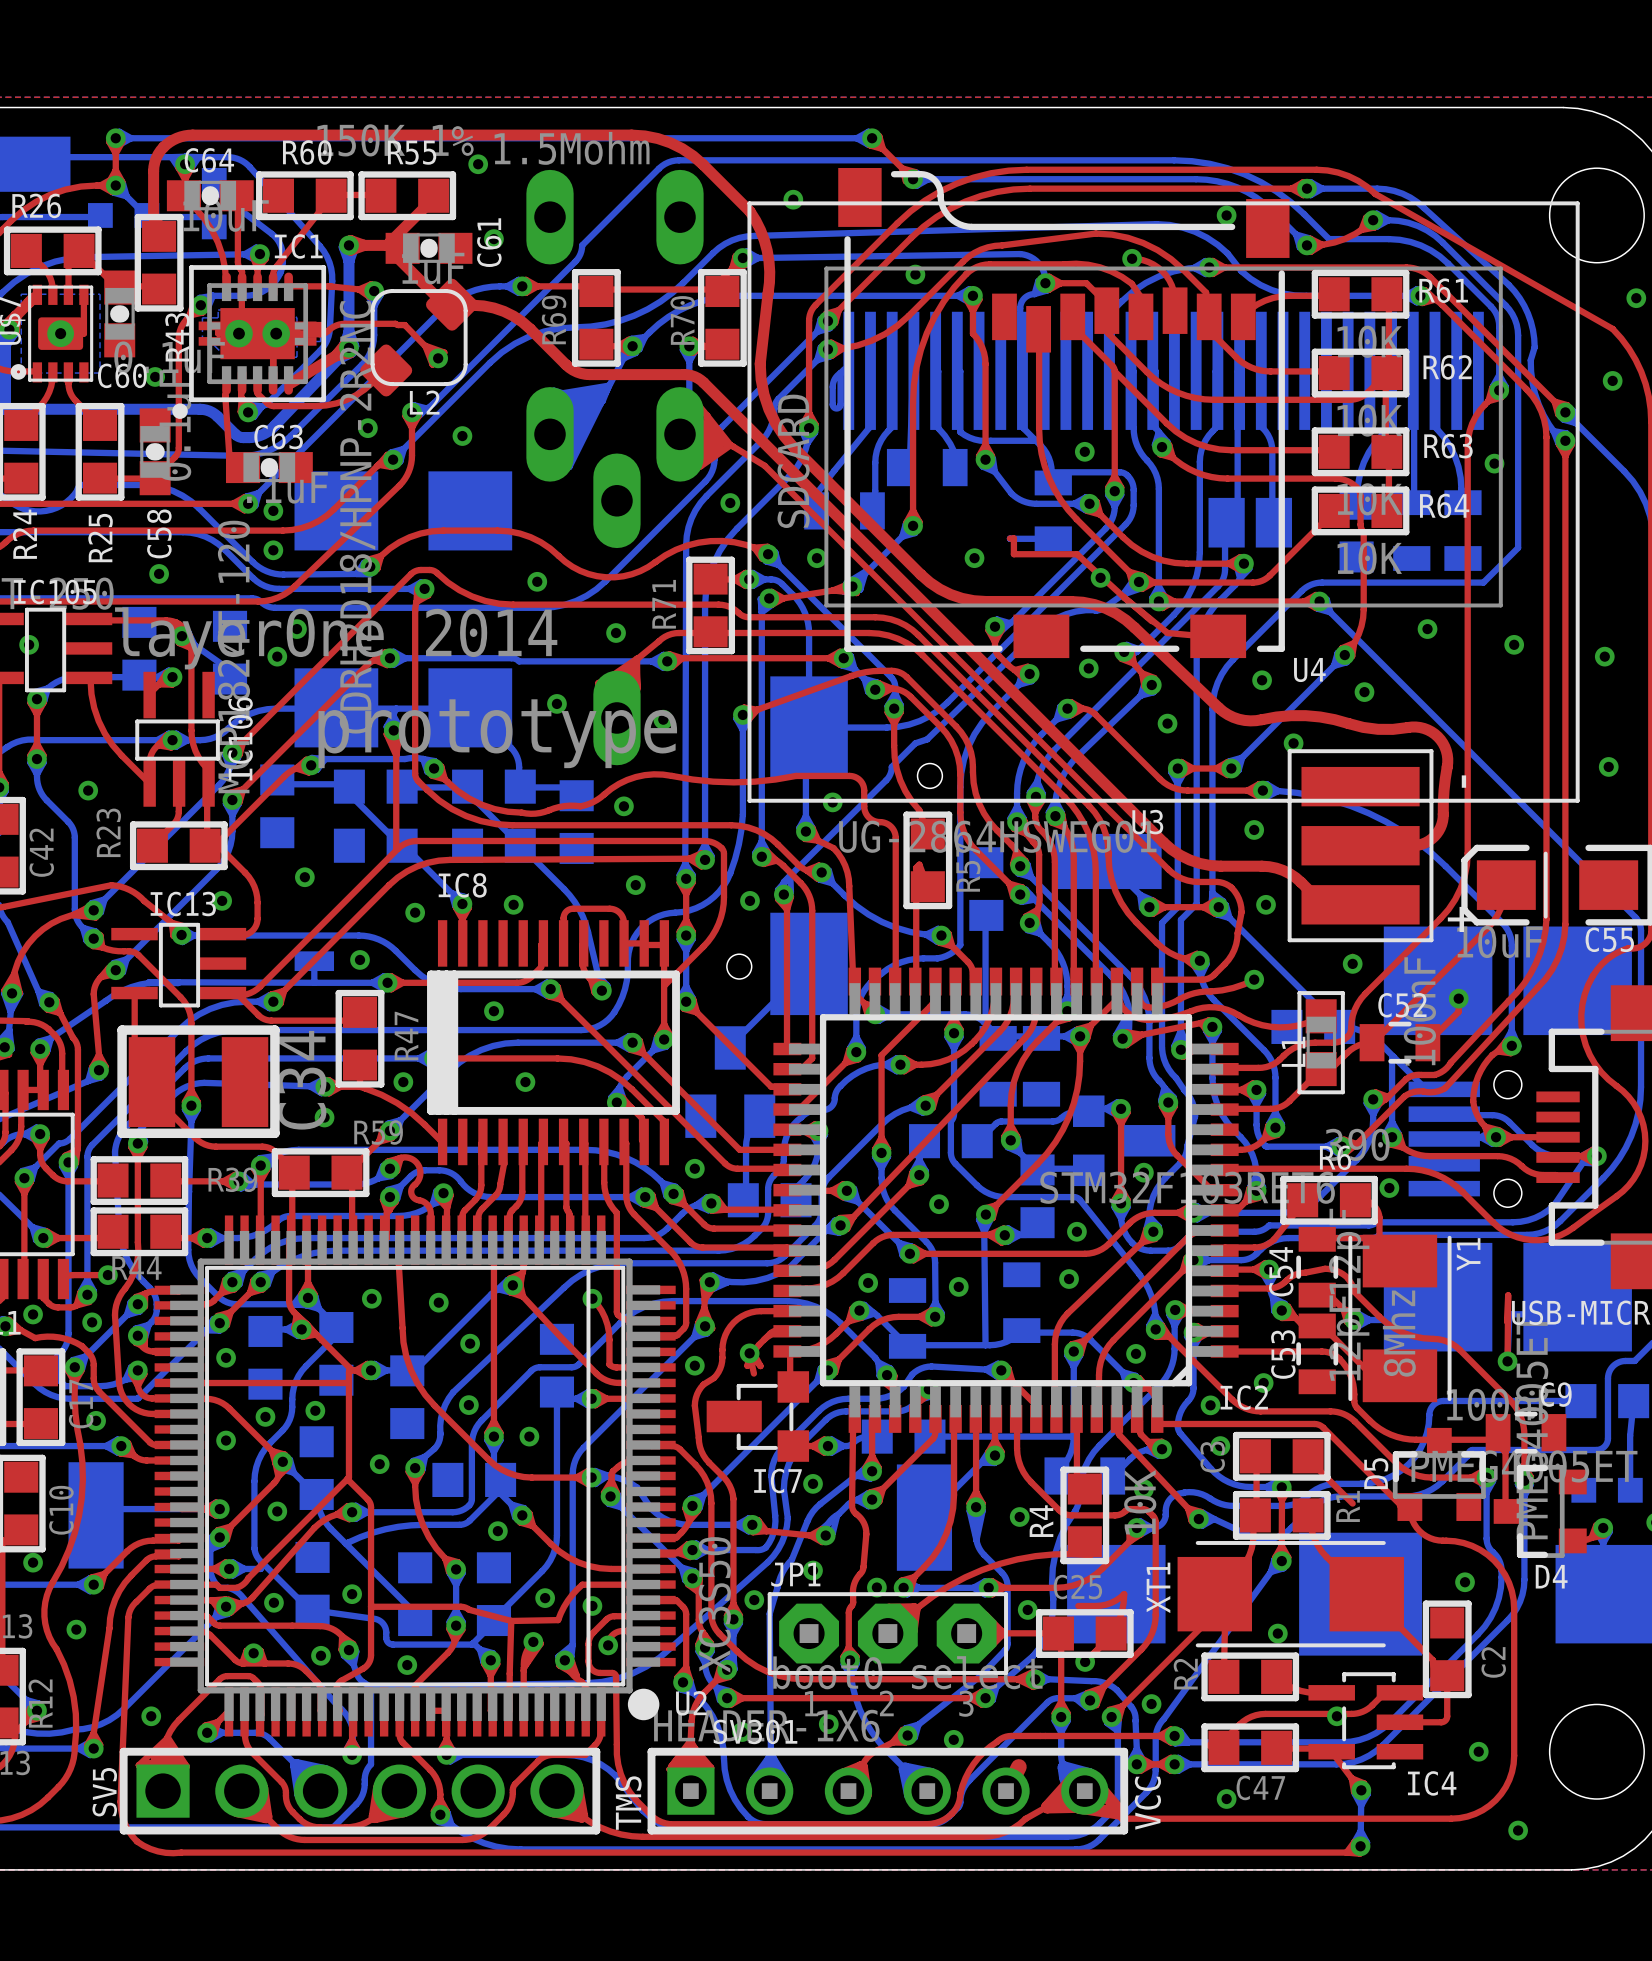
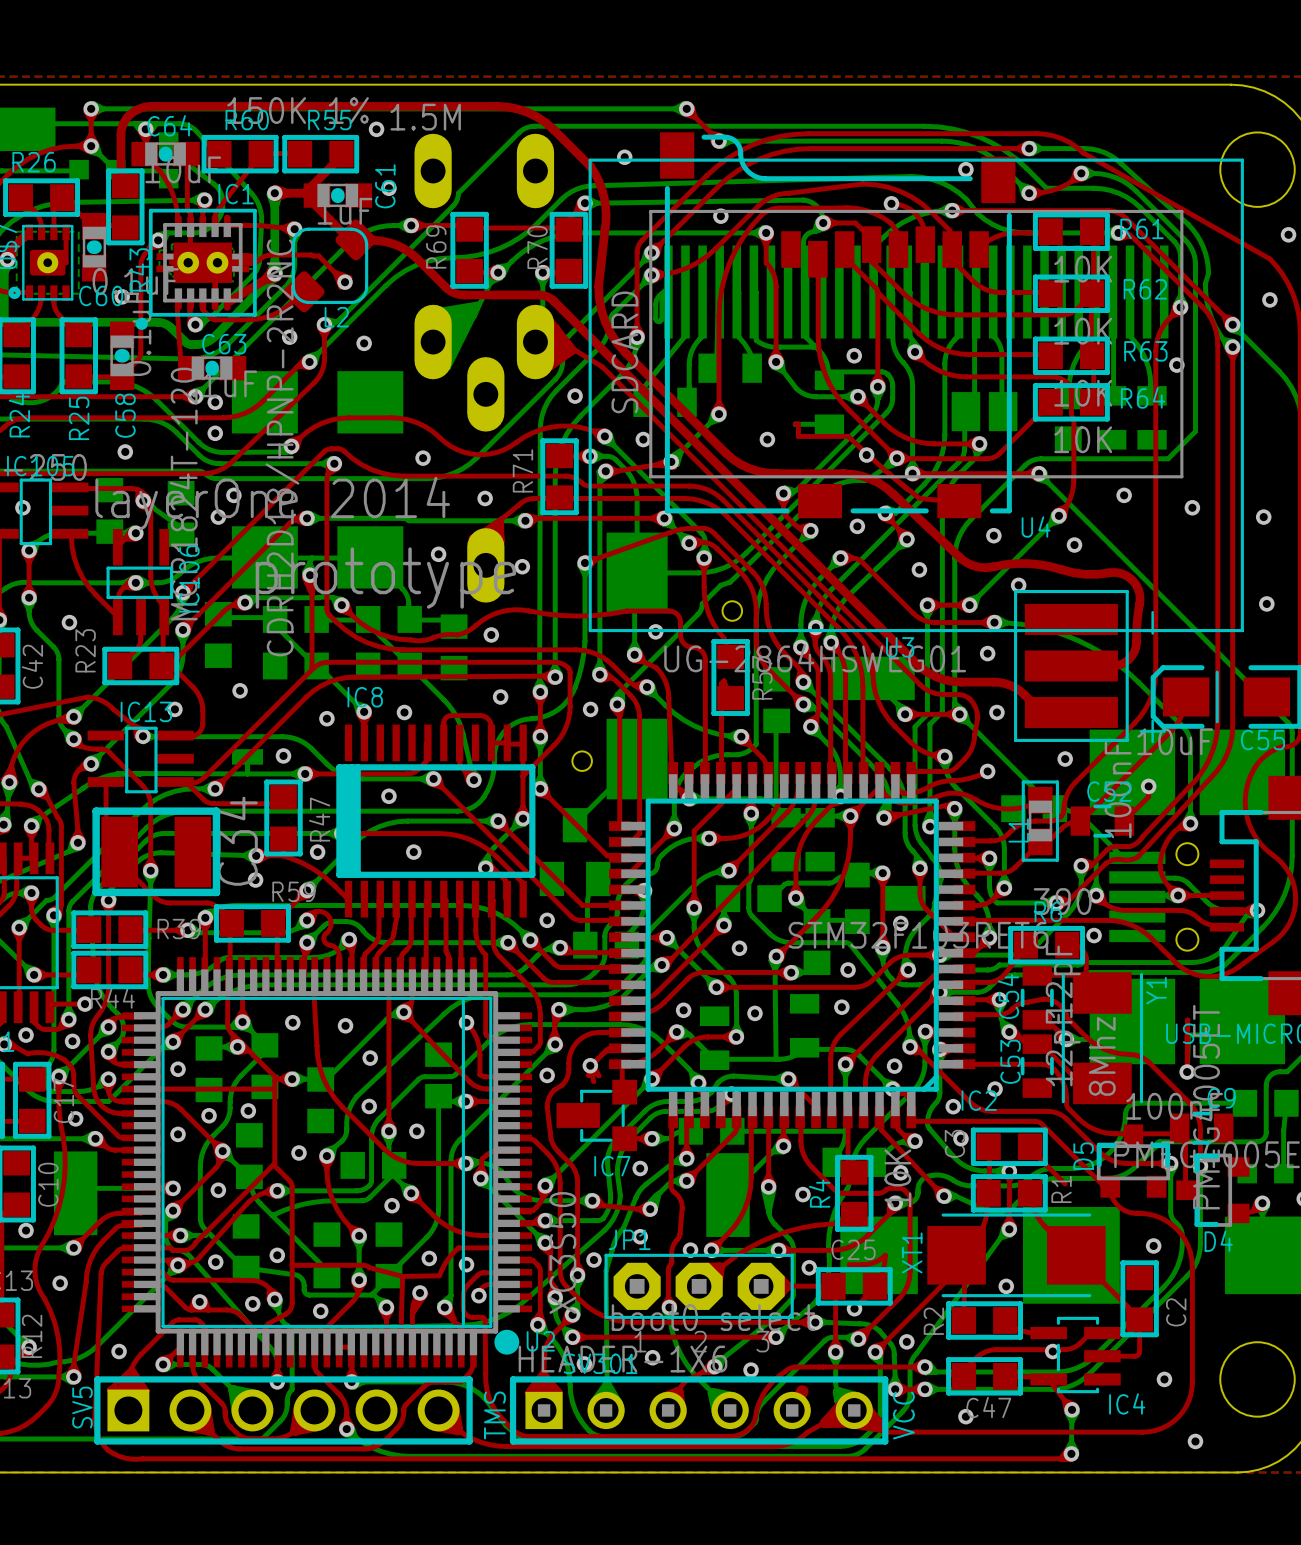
R55 value: 1.5Mohm (572, 148) -> 1.5M (425, 117)

